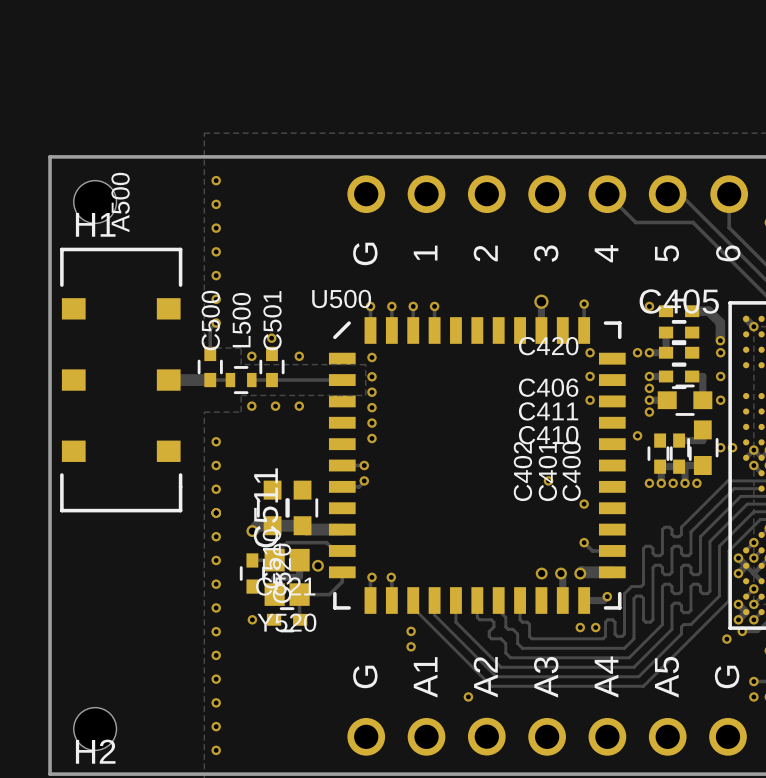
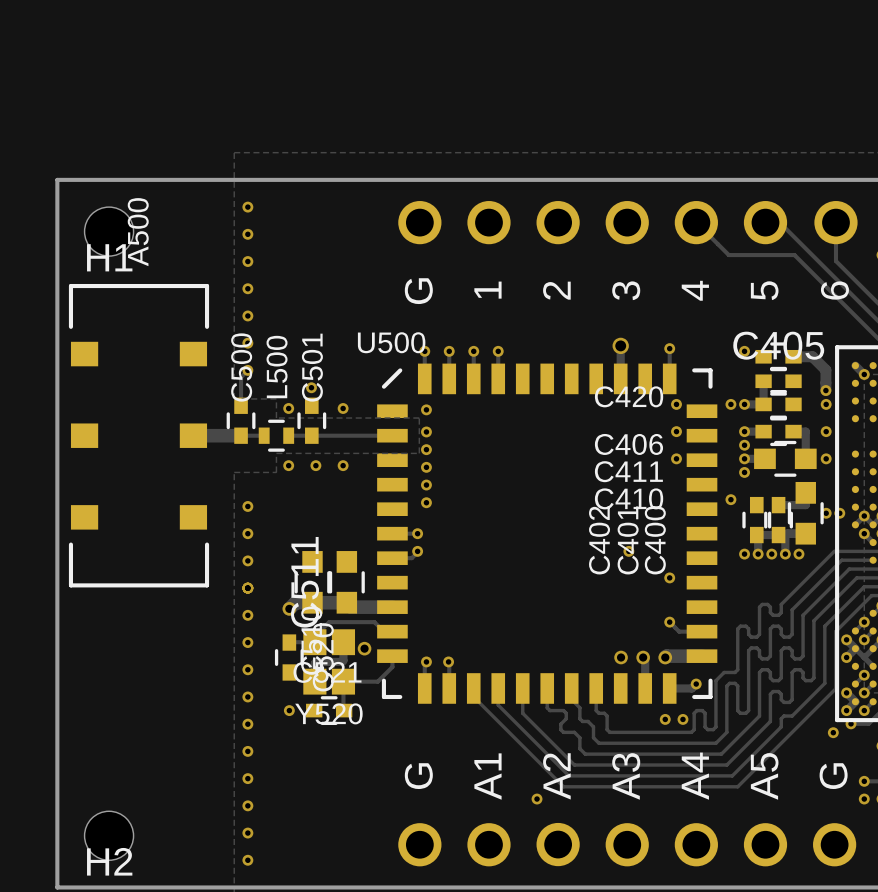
via: (411, 631) -> none
via: (411, 646) -> none

